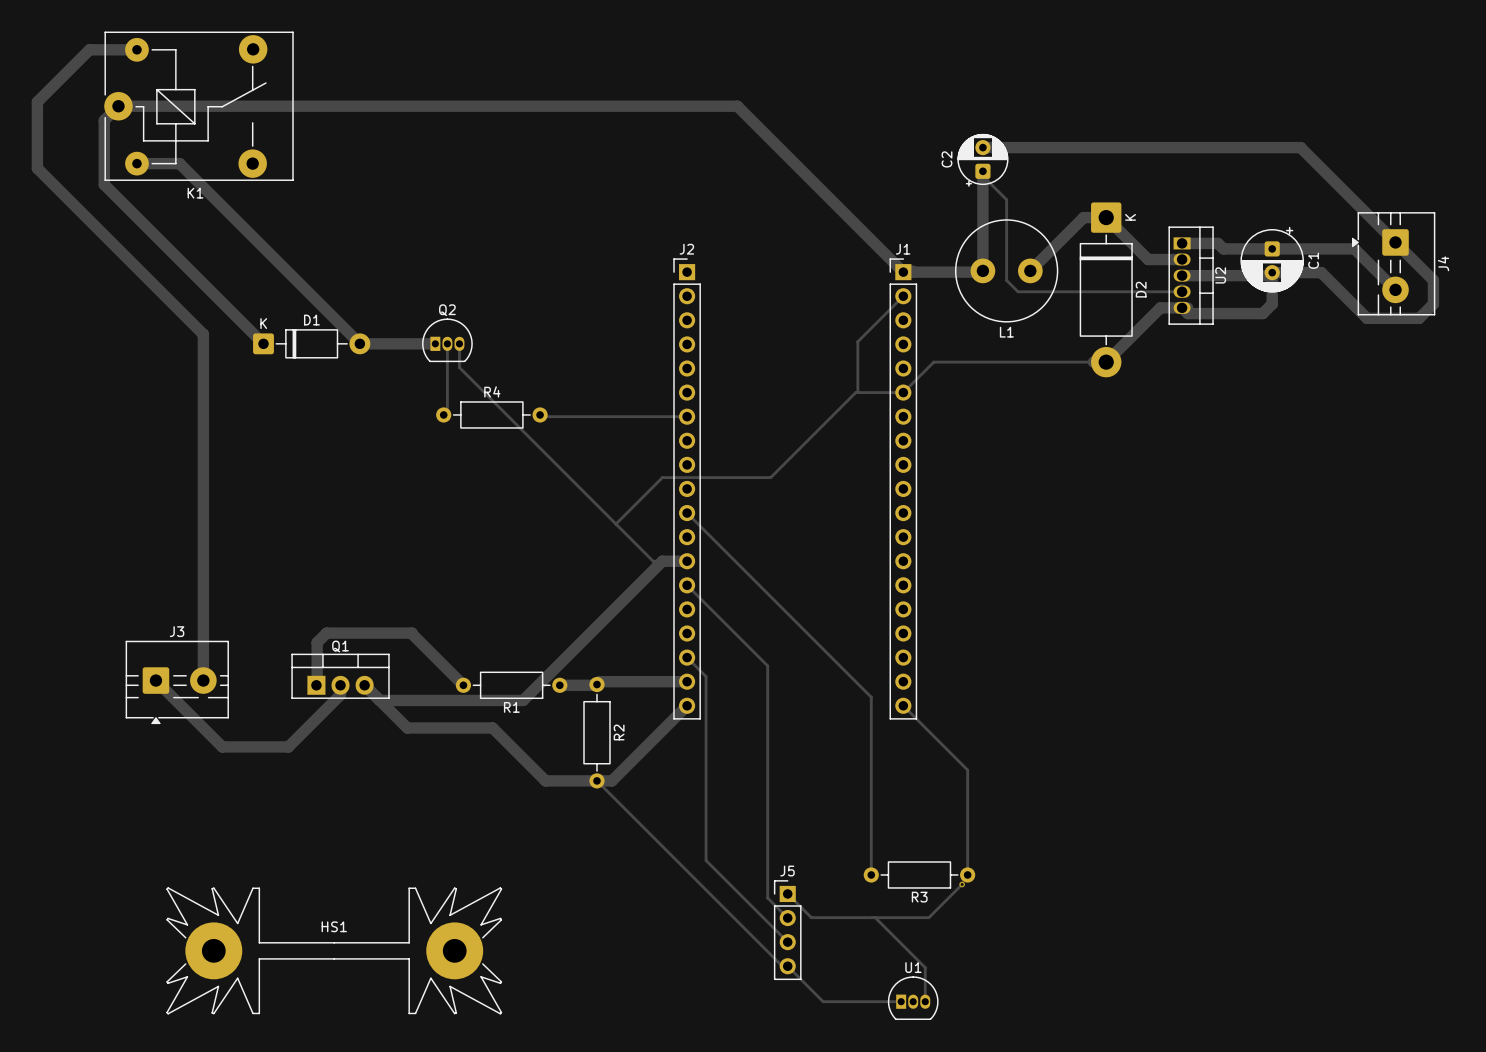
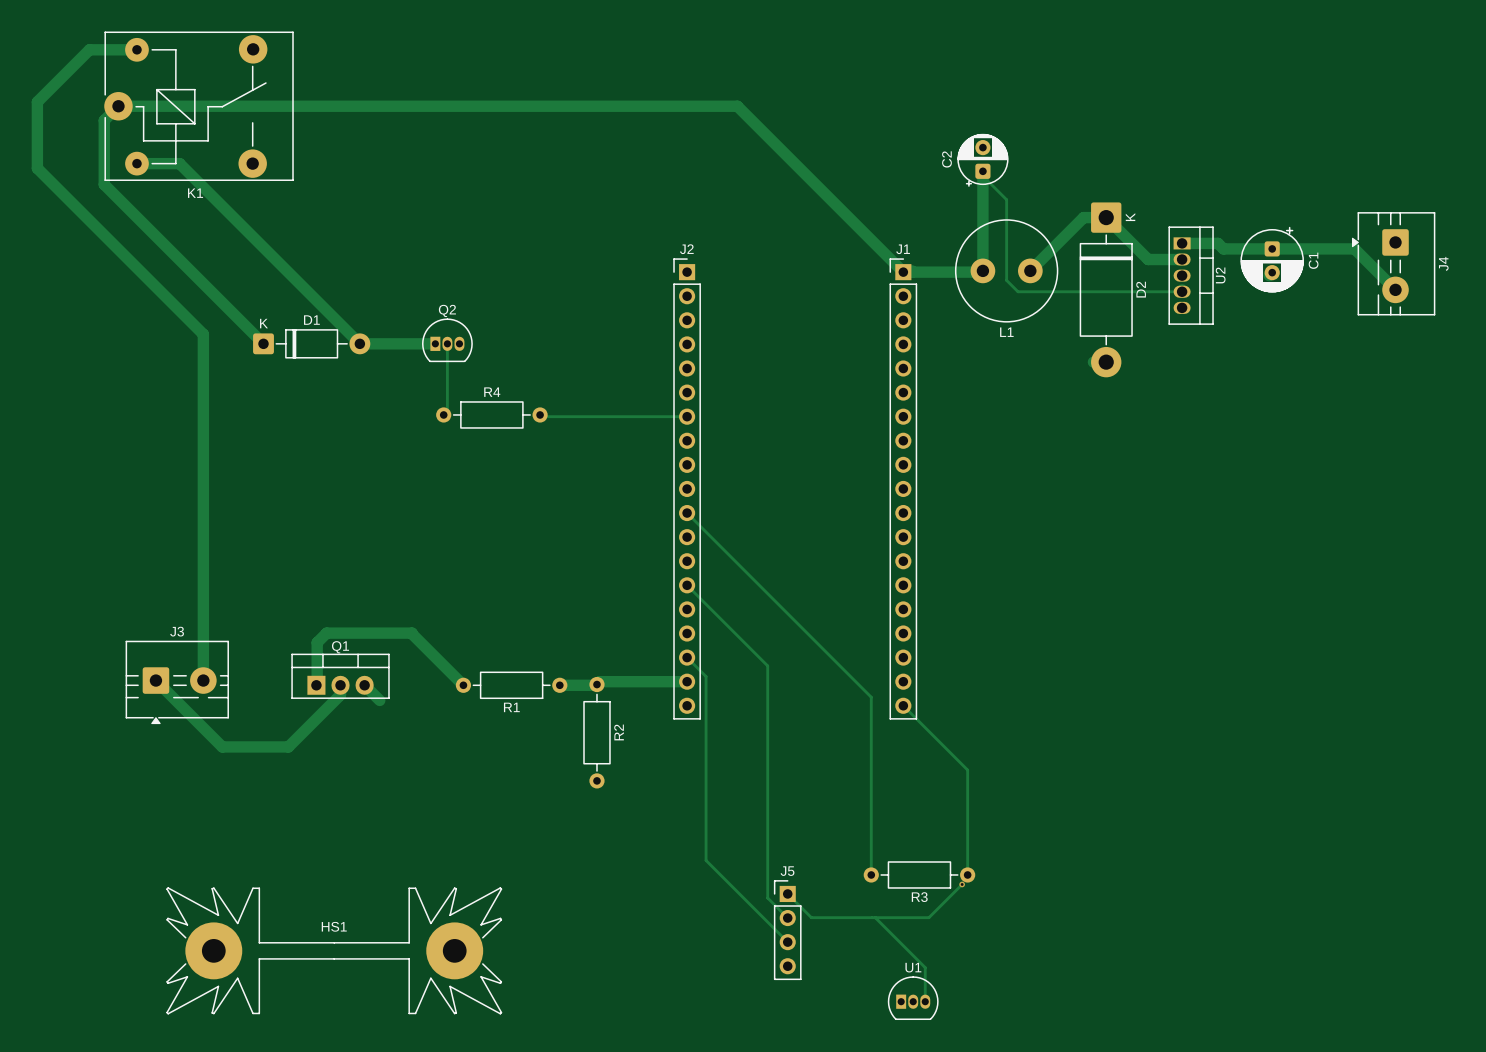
track: (982, 147) (1300, 147) (1433, 280) (1433, 304) (1419, 318) (1367, 318) (1321, 272) (1272, 272) (1272, 304) (1262, 313) (1187, 313) (1182, 307) -> none
track: (1182, 275) (1269, 275) -> none
track: (903, 296) (857, 341) (857, 392) -> none
track: (1187, 307) (1160, 307) (1106, 362) (933, 362) (903, 392) (855, 392) (770, 477) (662, 477) (615, 524) -> none
track: (459, 343) (459, 367) (653, 561) (654, 561) (687, 561) (662, 561) (523, 700) (379, 700) (407, 727) (492, 727) (545, 780) (611, 780) (687, 705) -> none
track: (596, 780) (782, 966) -> none
track: (787, 966) (823, 1001) (901, 1001) -> none

